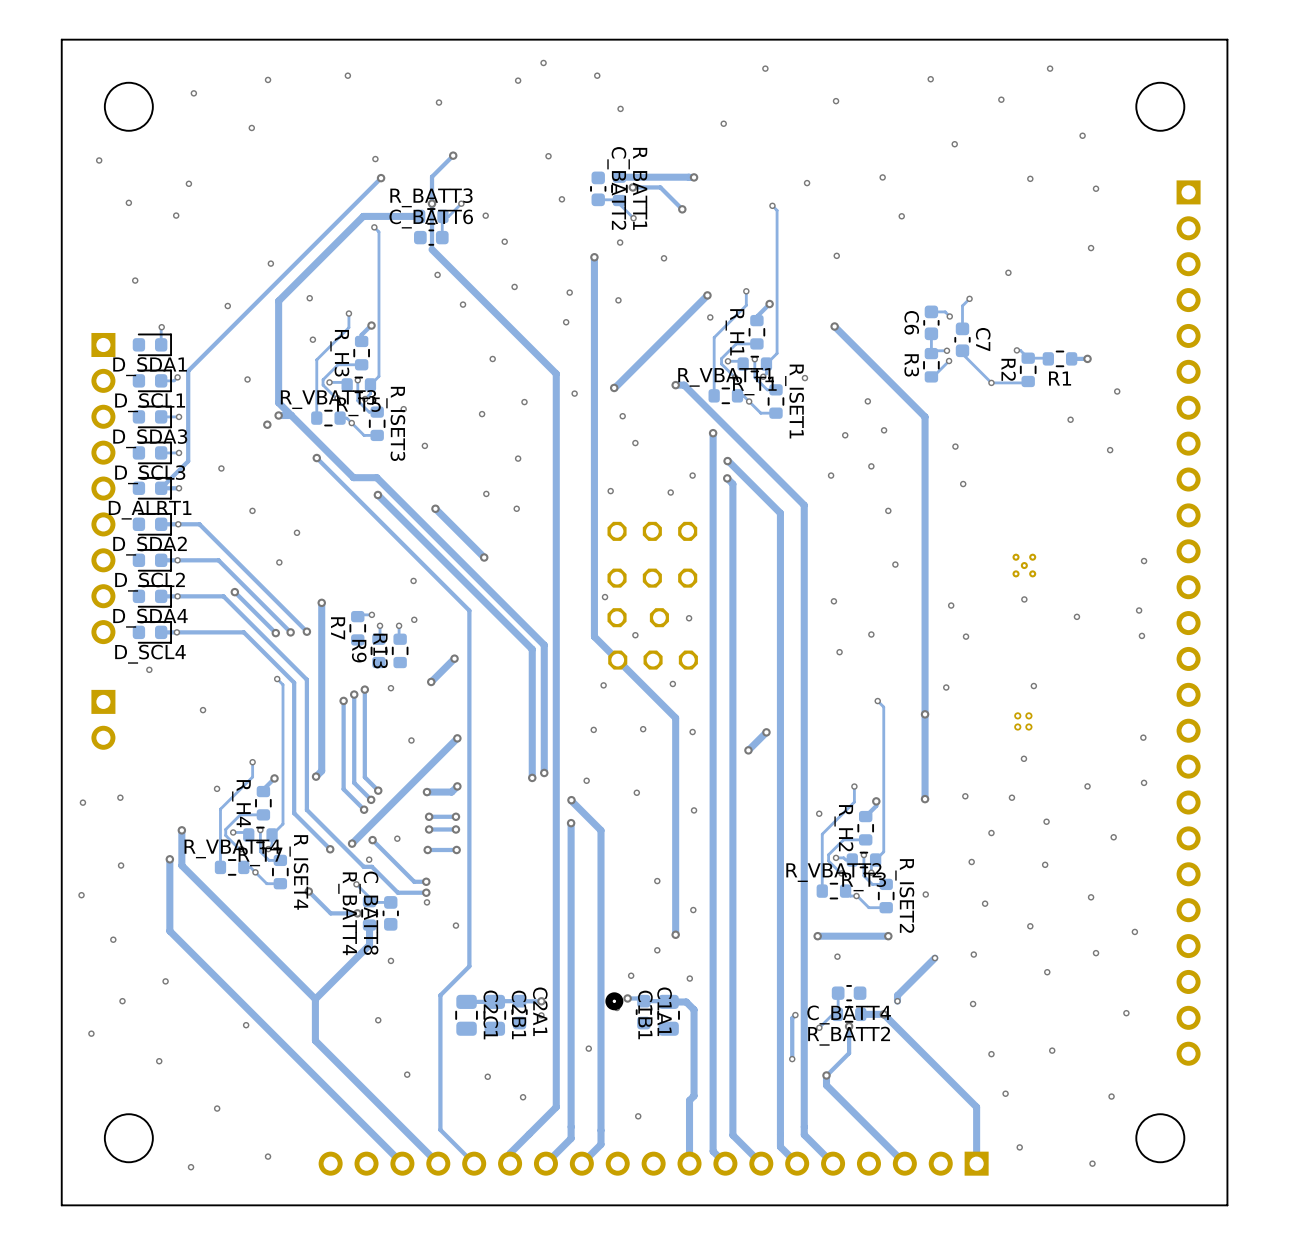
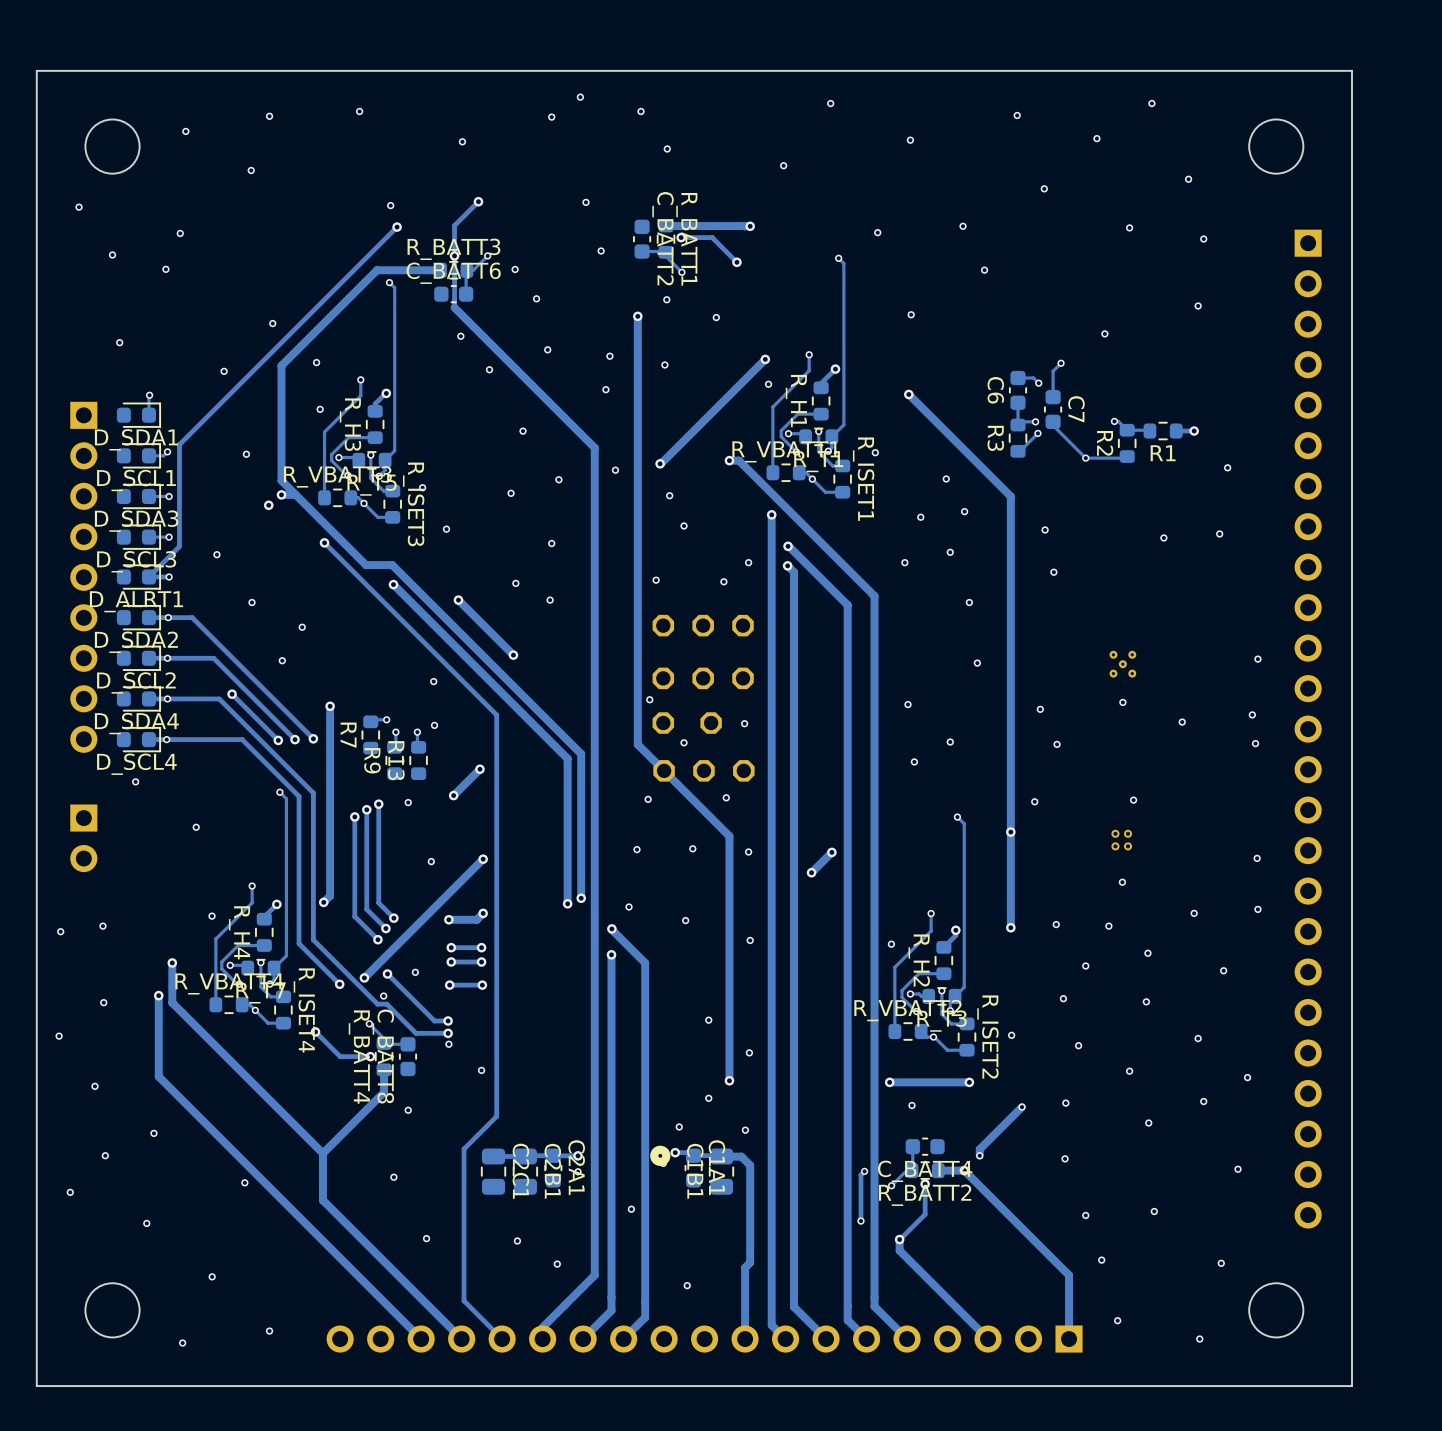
via position: (1070, 419) -> (1163, 537)

